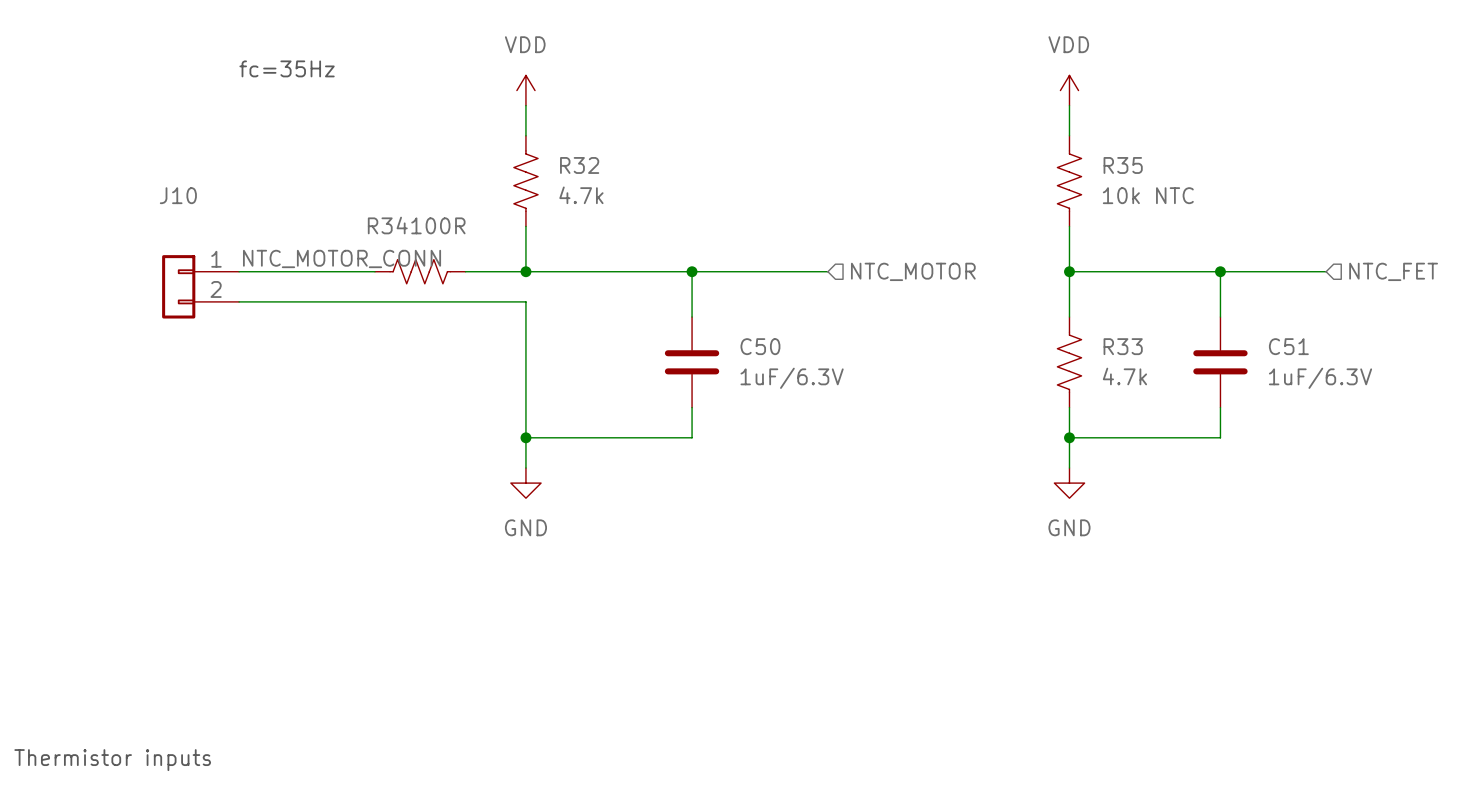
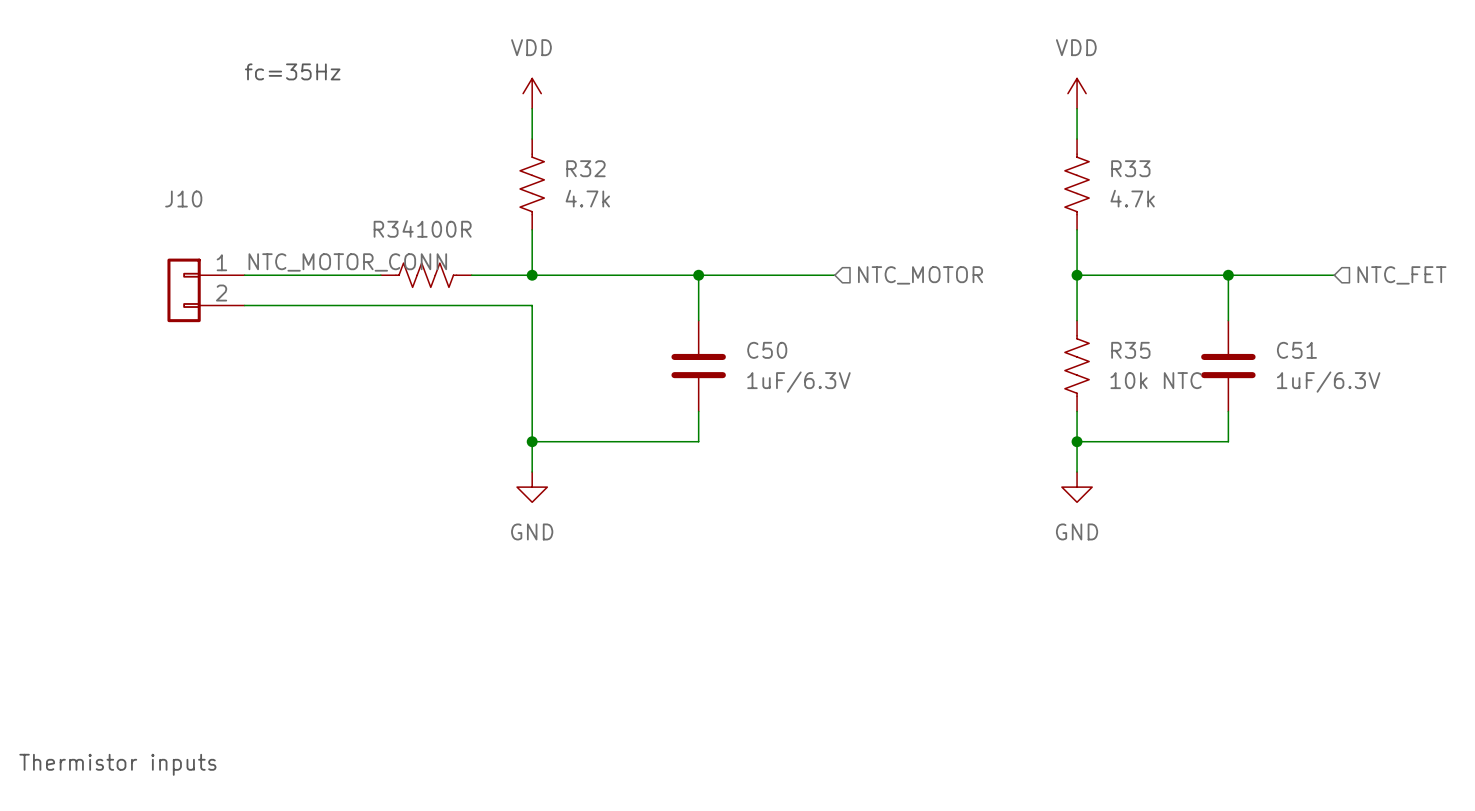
R35 name: R35 (1123, 165) -> R33 (1130, 168)
R35 value: 10k NTC (1148, 195) -> 4.7k (1132, 198)
R33 name: R33 (1123, 346) -> R35 (1130, 350)
R33 value: 4.7k (1124, 376) -> 10k NTC (1156, 380)

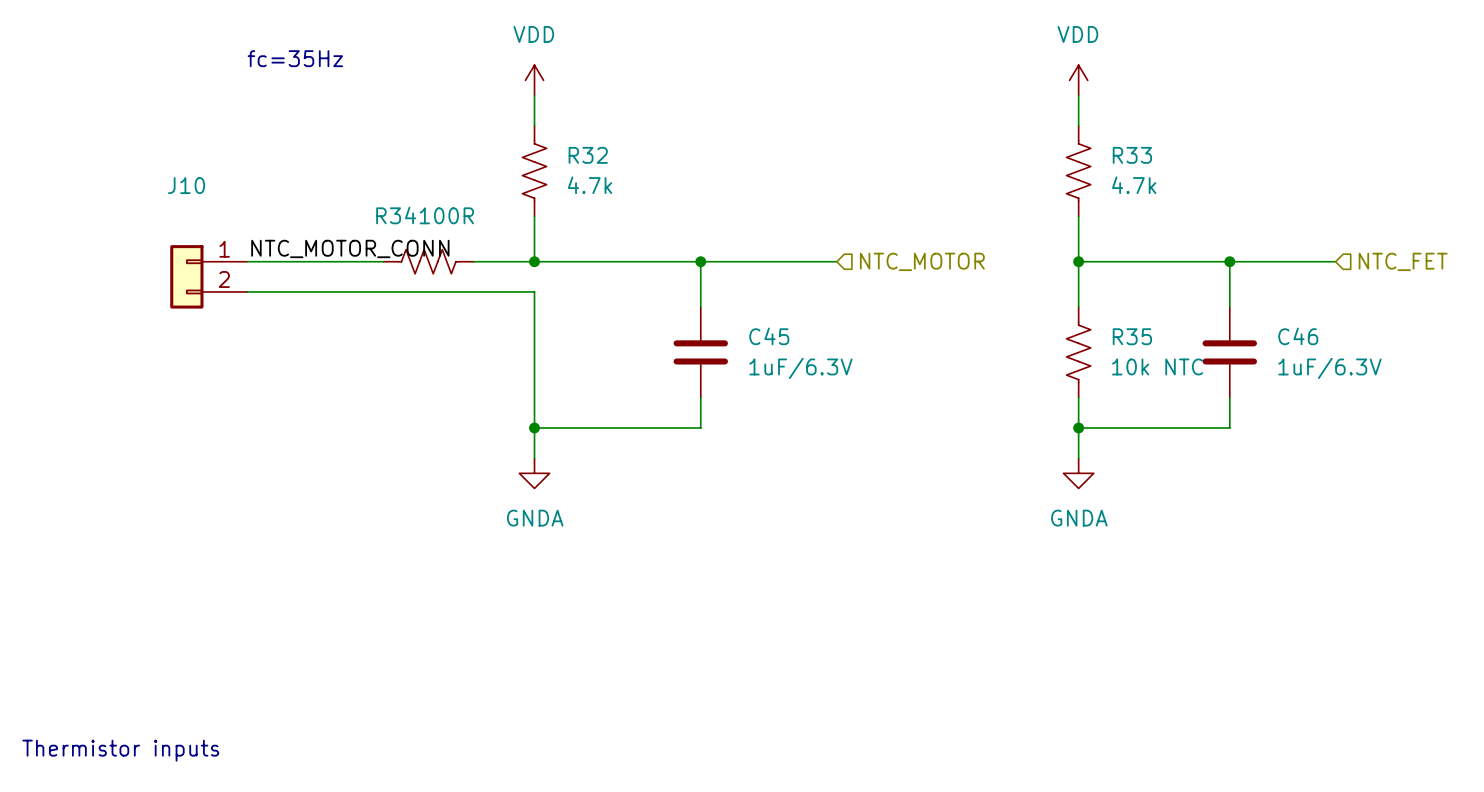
C50 name: C50 (767, 350) -> C45 (769, 336)
C51 name: C51 (1296, 350) -> C46 (1298, 336)
power symbol: GND (532, 487) -> GNDA (534, 473)
power symbol: GND (1077, 487) -> GNDA (1078, 473)

